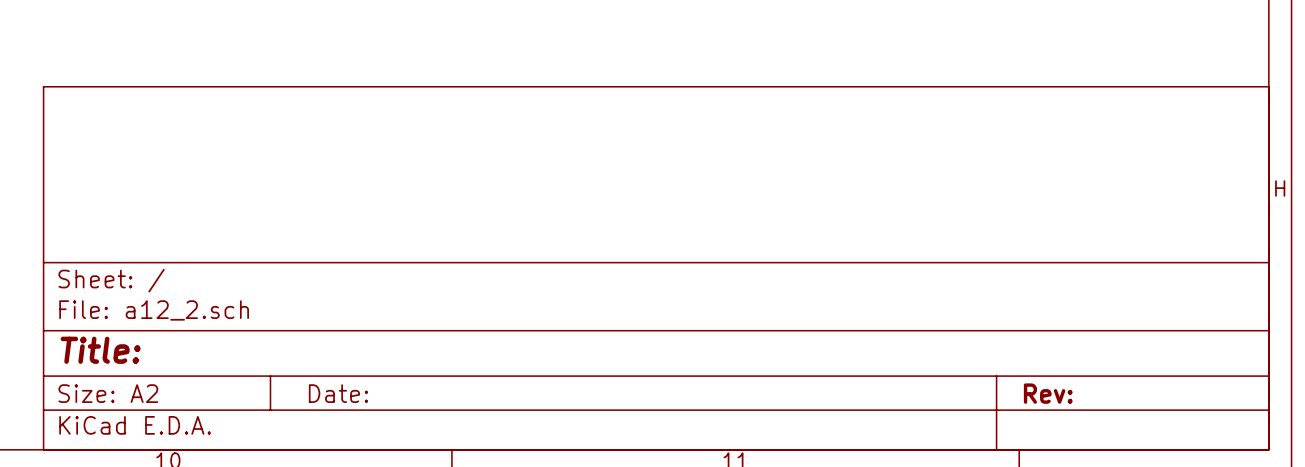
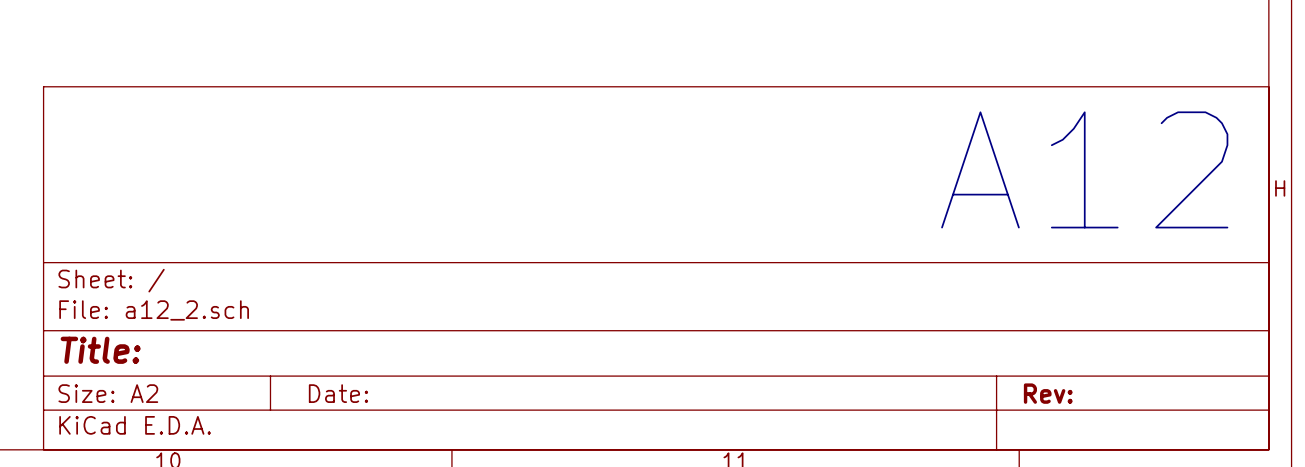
text: none -> A12 (1084, 169)

